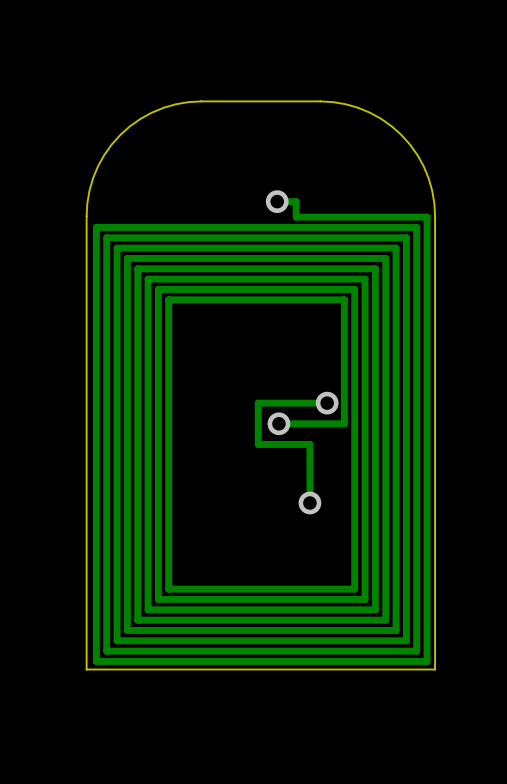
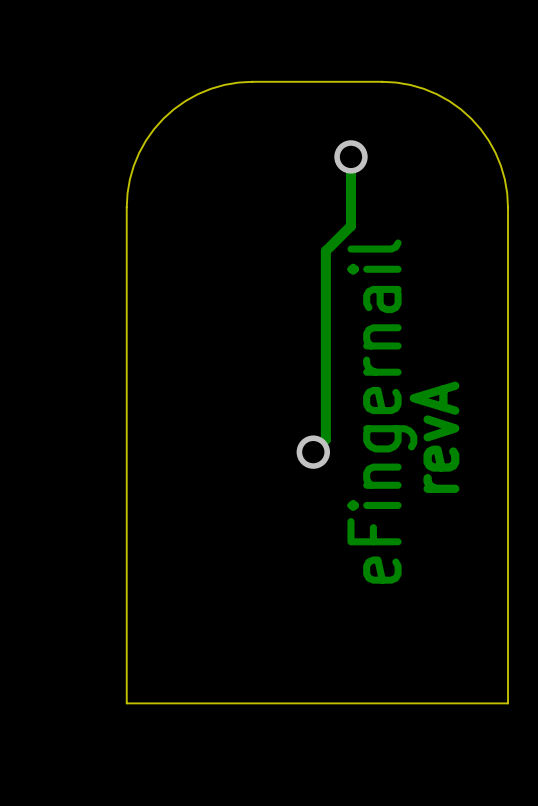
track: none -> (350, 156) (350, 226) (325, 251) (325, 439) (313, 452)
via: none -> (350, 156)
track: (277, 201) (296, 201) (296, 217) (427, 217) (427, 661) (96, 661) (96, 227) (416, 227) (416, 651) (106, 651) (106, 237) (406, 237) (406, 640) (117, 640) (117, 248) (396, 248) (396, 630) (127, 630) (127, 258) (385, 258) (385, 620) (137, 620) (137, 268) (375, 268) (375, 609) (148, 609) (148, 279) (365, 279) (365, 599) (158, 599) (158, 289) (354, 289) (354, 589) (168, 589) (168, 299) (344, 299) (344, 423) (278, 423) -> none
via: (277, 201) -> none
text: none -> eFingernail (382, 411)
track: (327, 403) (258, 403) (258, 444) (309, 444) (309, 503) -> none
via: (327, 403) -> none
via: (278, 423) -> none
text: none -> revA (434, 437)
via: none -> (313, 452)
via: (309, 503) -> none

